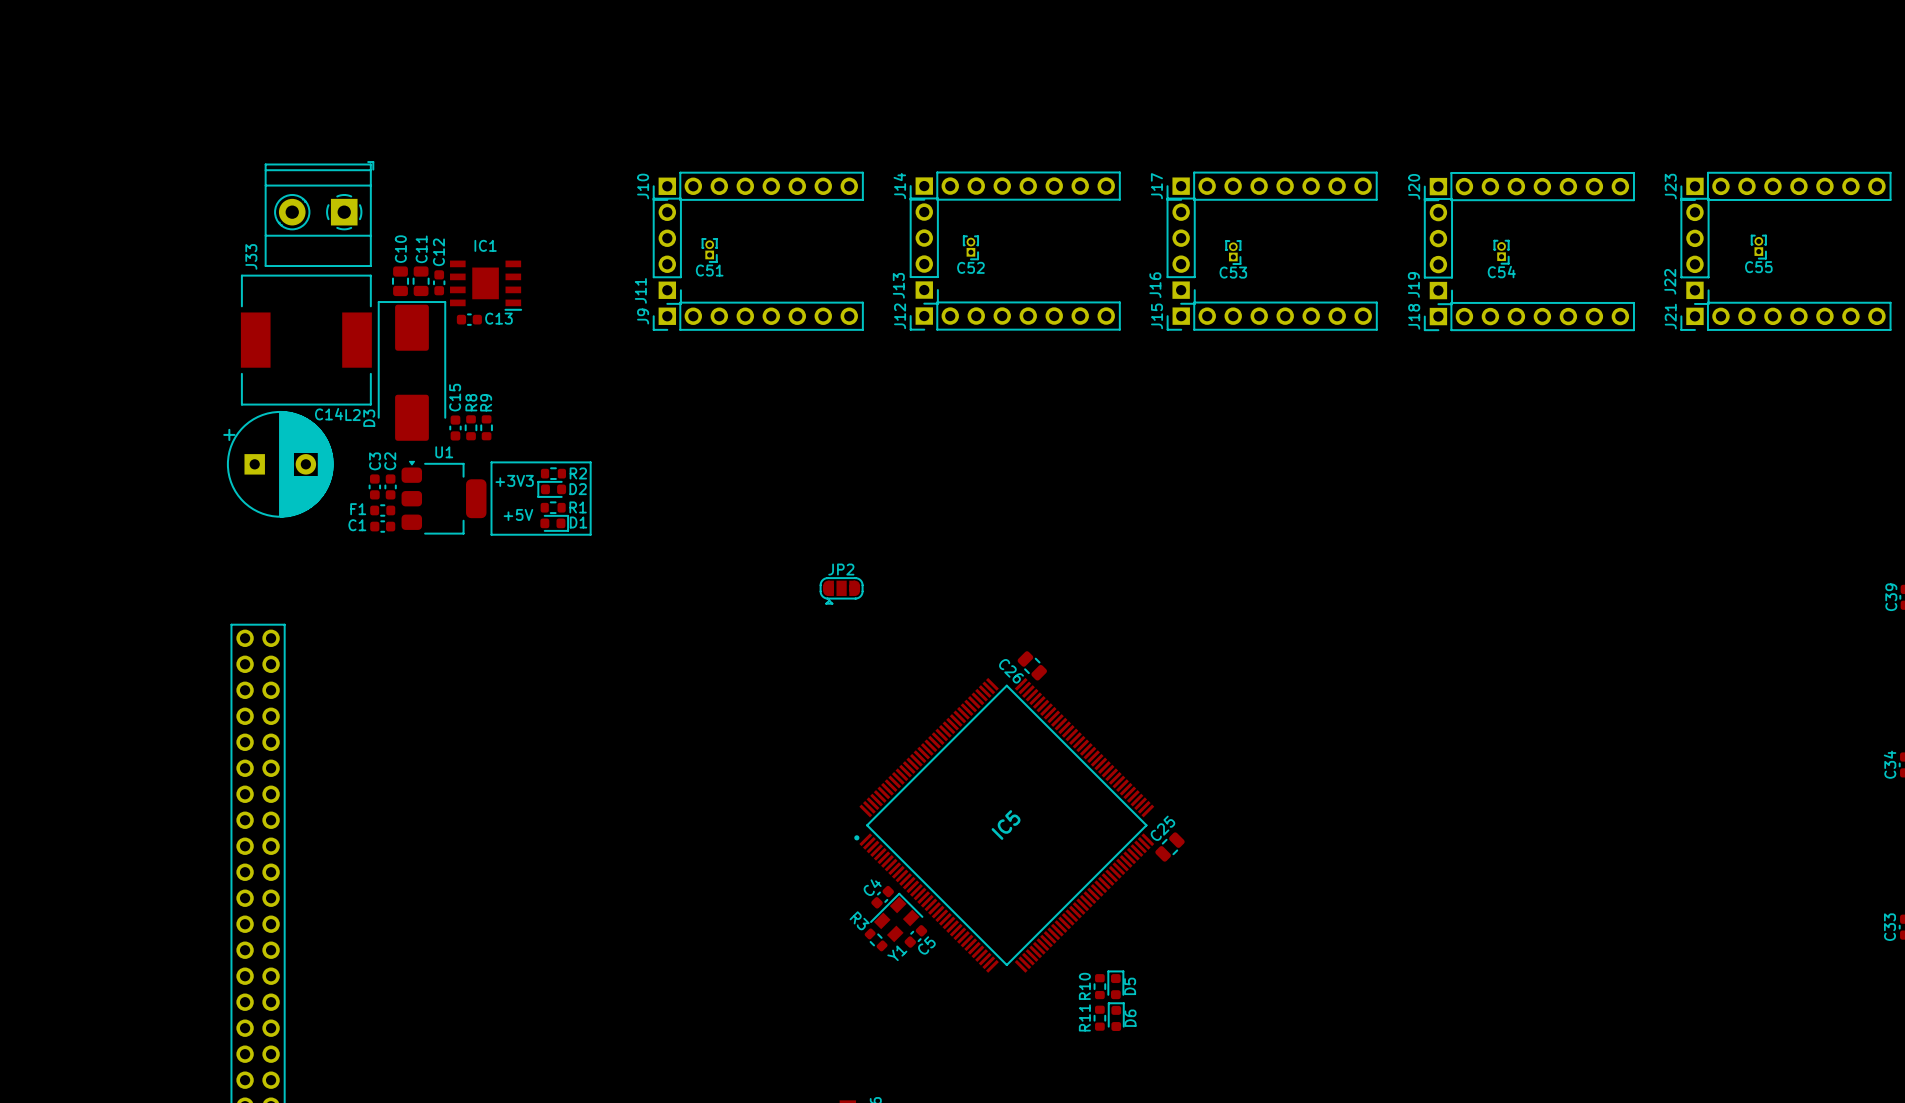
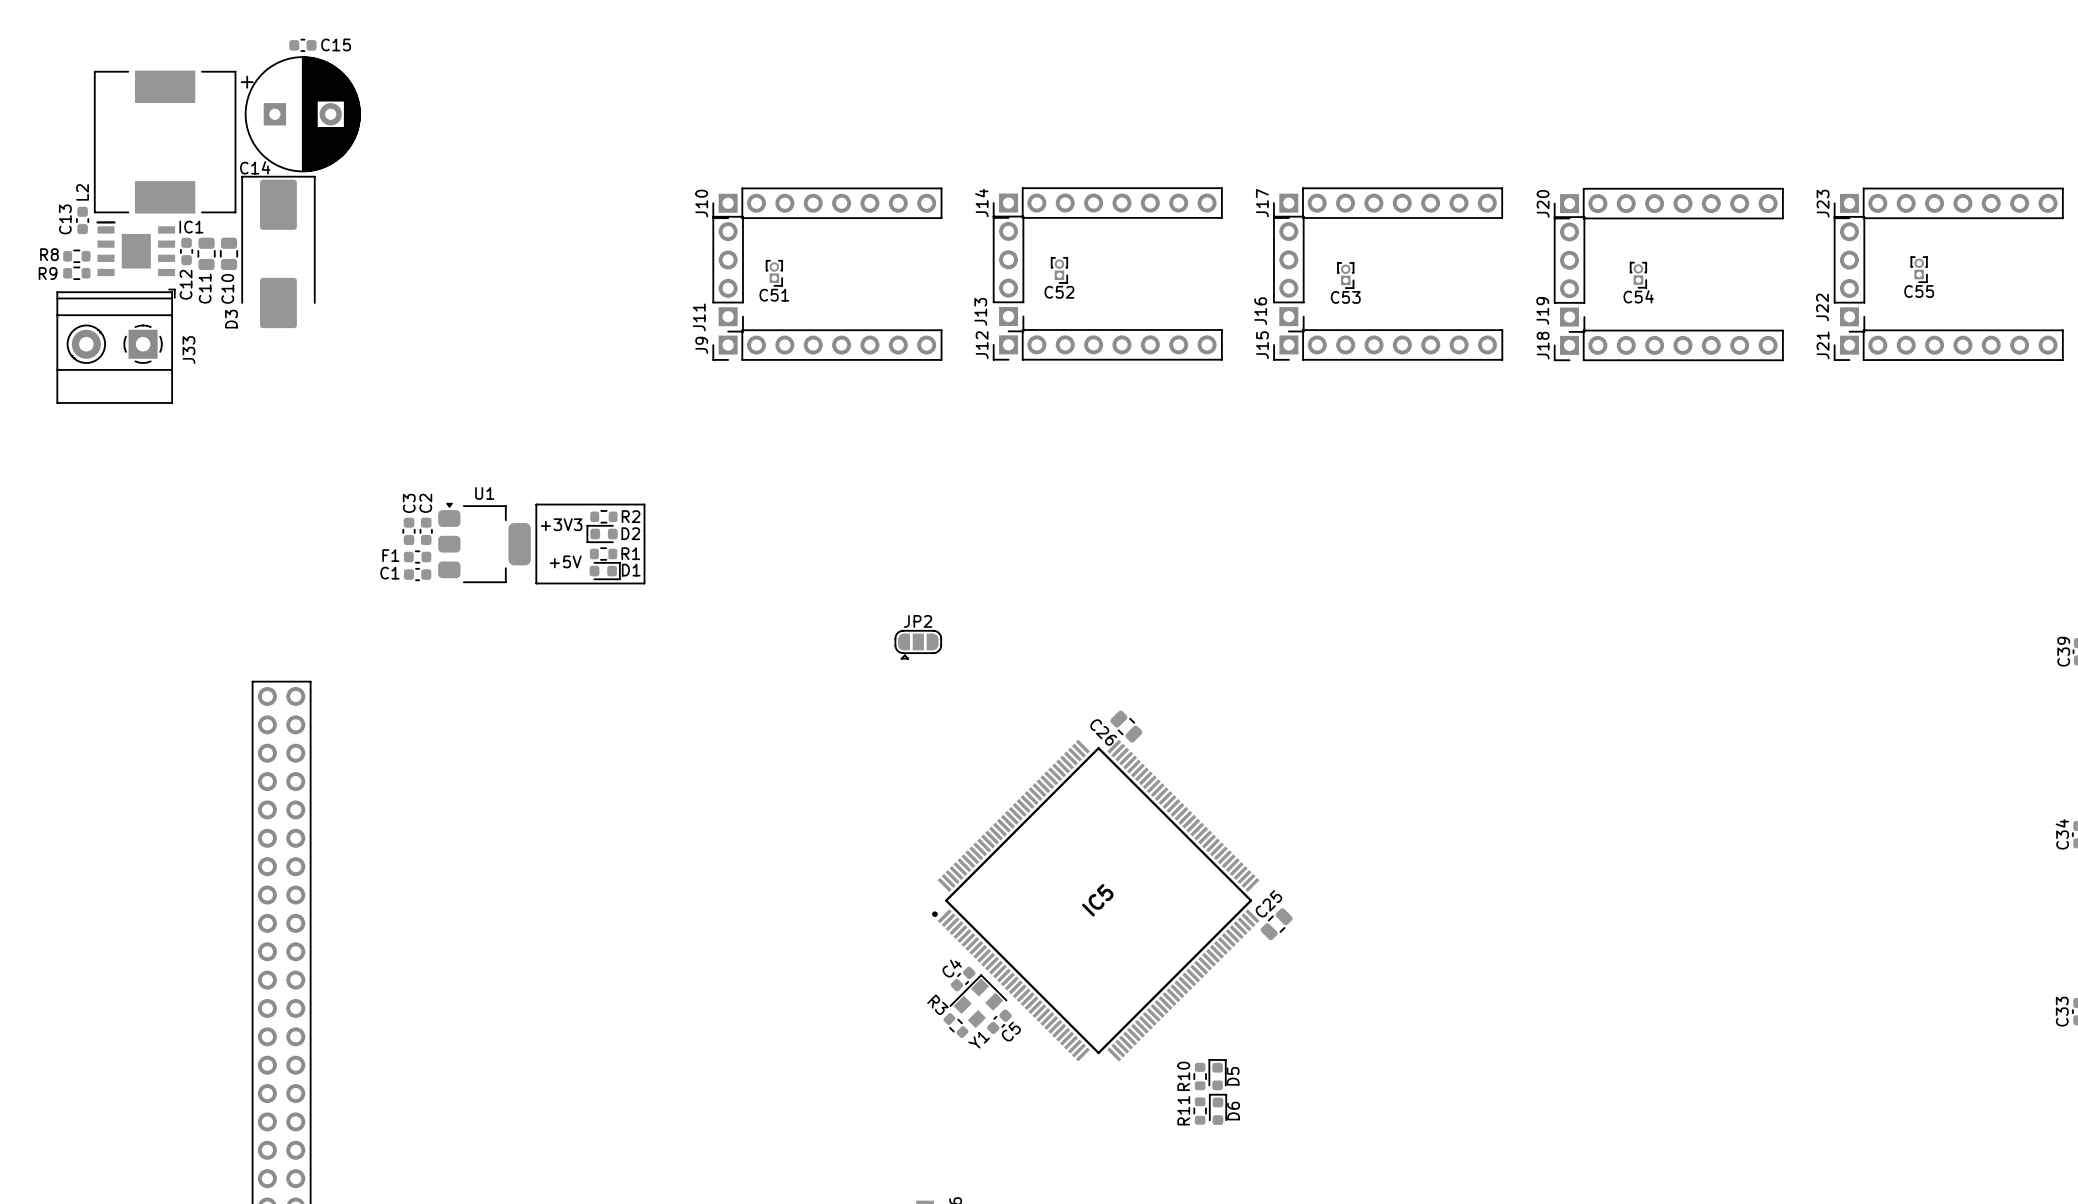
J33 position: (319, 214) -> (116, 346)
IC1 name position: IC1 (485, 245) -> IC1 (191, 227)
C10 name position: C10 (400, 249) -> C10 (227, 288)
C11 name position: C11 (421, 249) -> C11 (205, 288)
C12 name position: C12 (438, 252) -> C12 (186, 284)
J33 name position: J33 (251, 256) -> J33 (188, 350)
C10 position: (400, 281) -> (229, 253)
C11 position: (421, 281) -> (206, 253)
C12 position: (439, 282) -> (186, 251)
IC1 rotation: 0° (486, 285) -> 180° (135, 248)
IC1 position: (486, 285) -> (135, 248)
C13 name position: C13 (498, 318) -> C13 (65, 219)
C13 rotation: 0° (469, 319) -> 90° clockwise (82, 220)
C13 position: (469, 319) -> (82, 220)
L2 rotation: 0° (306, 340) -> 90° clockwise (165, 142)
L2 position: (306, 340) -> (165, 142)
D3 position: (411, 371) -> (278, 252)
R8 name position: R8 (471, 402) -> R8 (49, 254)
R9 name position: R9 (486, 402) -> R9 (48, 273)
C14 name position: C14 (329, 414) -> C14 (255, 167)
D3 name position: D3 (369, 418) -> D3 (231, 319)
R8 rotation: 0° (471, 427) -> 90° clockwise (76, 256)
R8 position: (471, 427) -> (76, 256)
R9 rotation: 0° (486, 427) -> 90° clockwise (76, 273)
R9 position: (486, 427) -> (76, 273)
C15 rotation: 0° (455, 428) -> 90° clockwise (302, 45)
C15 position: (455, 428) -> (302, 45)
C14 position: (278, 464) -> (300, 114)

